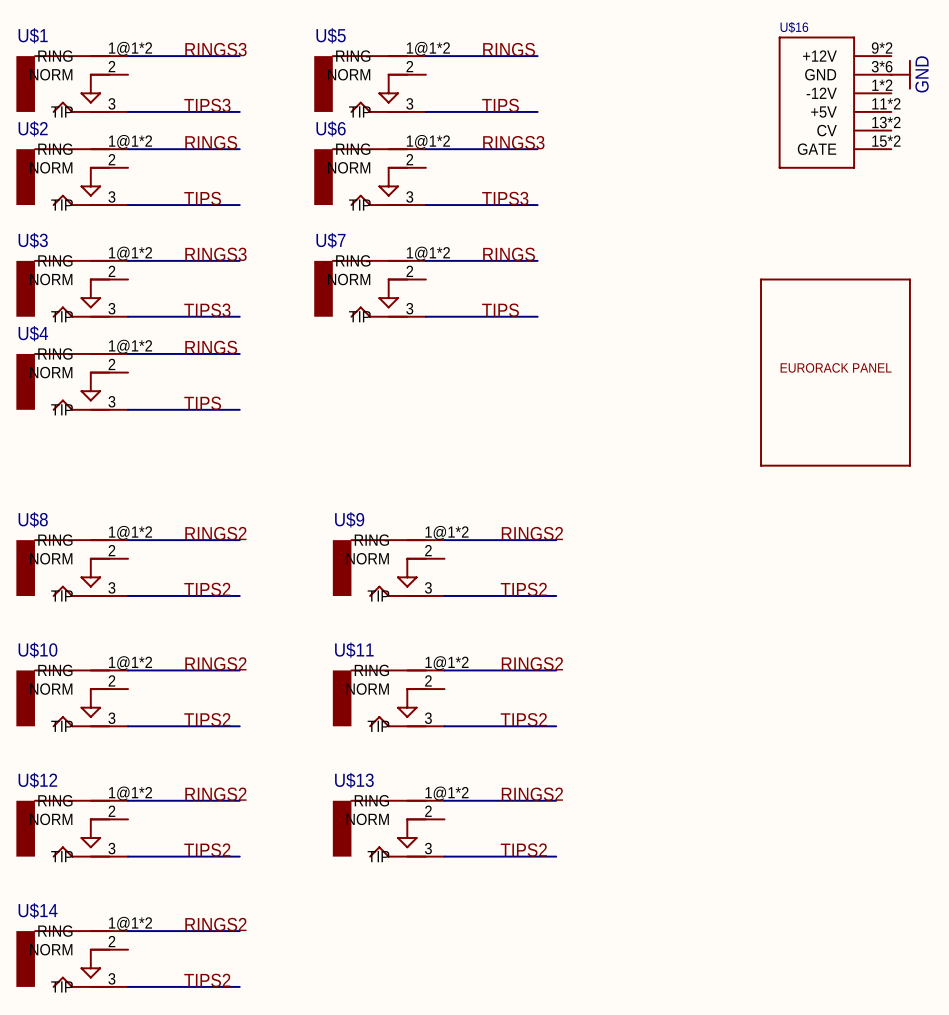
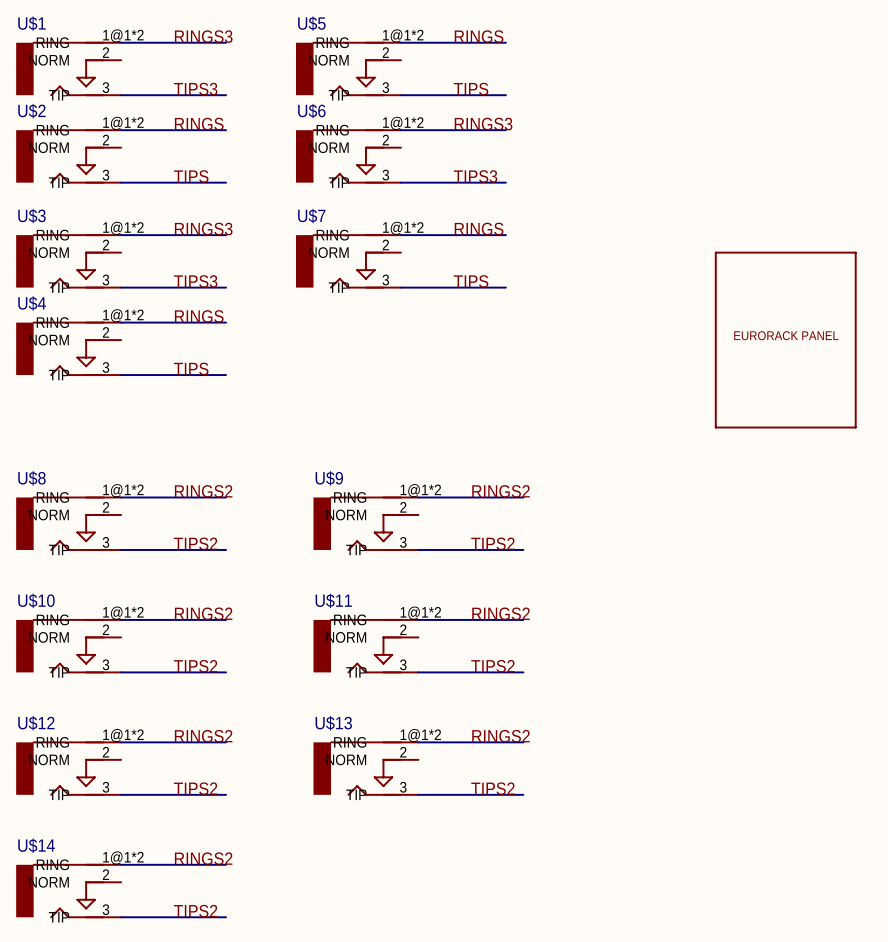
power symbol: GND (901, 74) -> none
U$16: (835, 102) -> none

